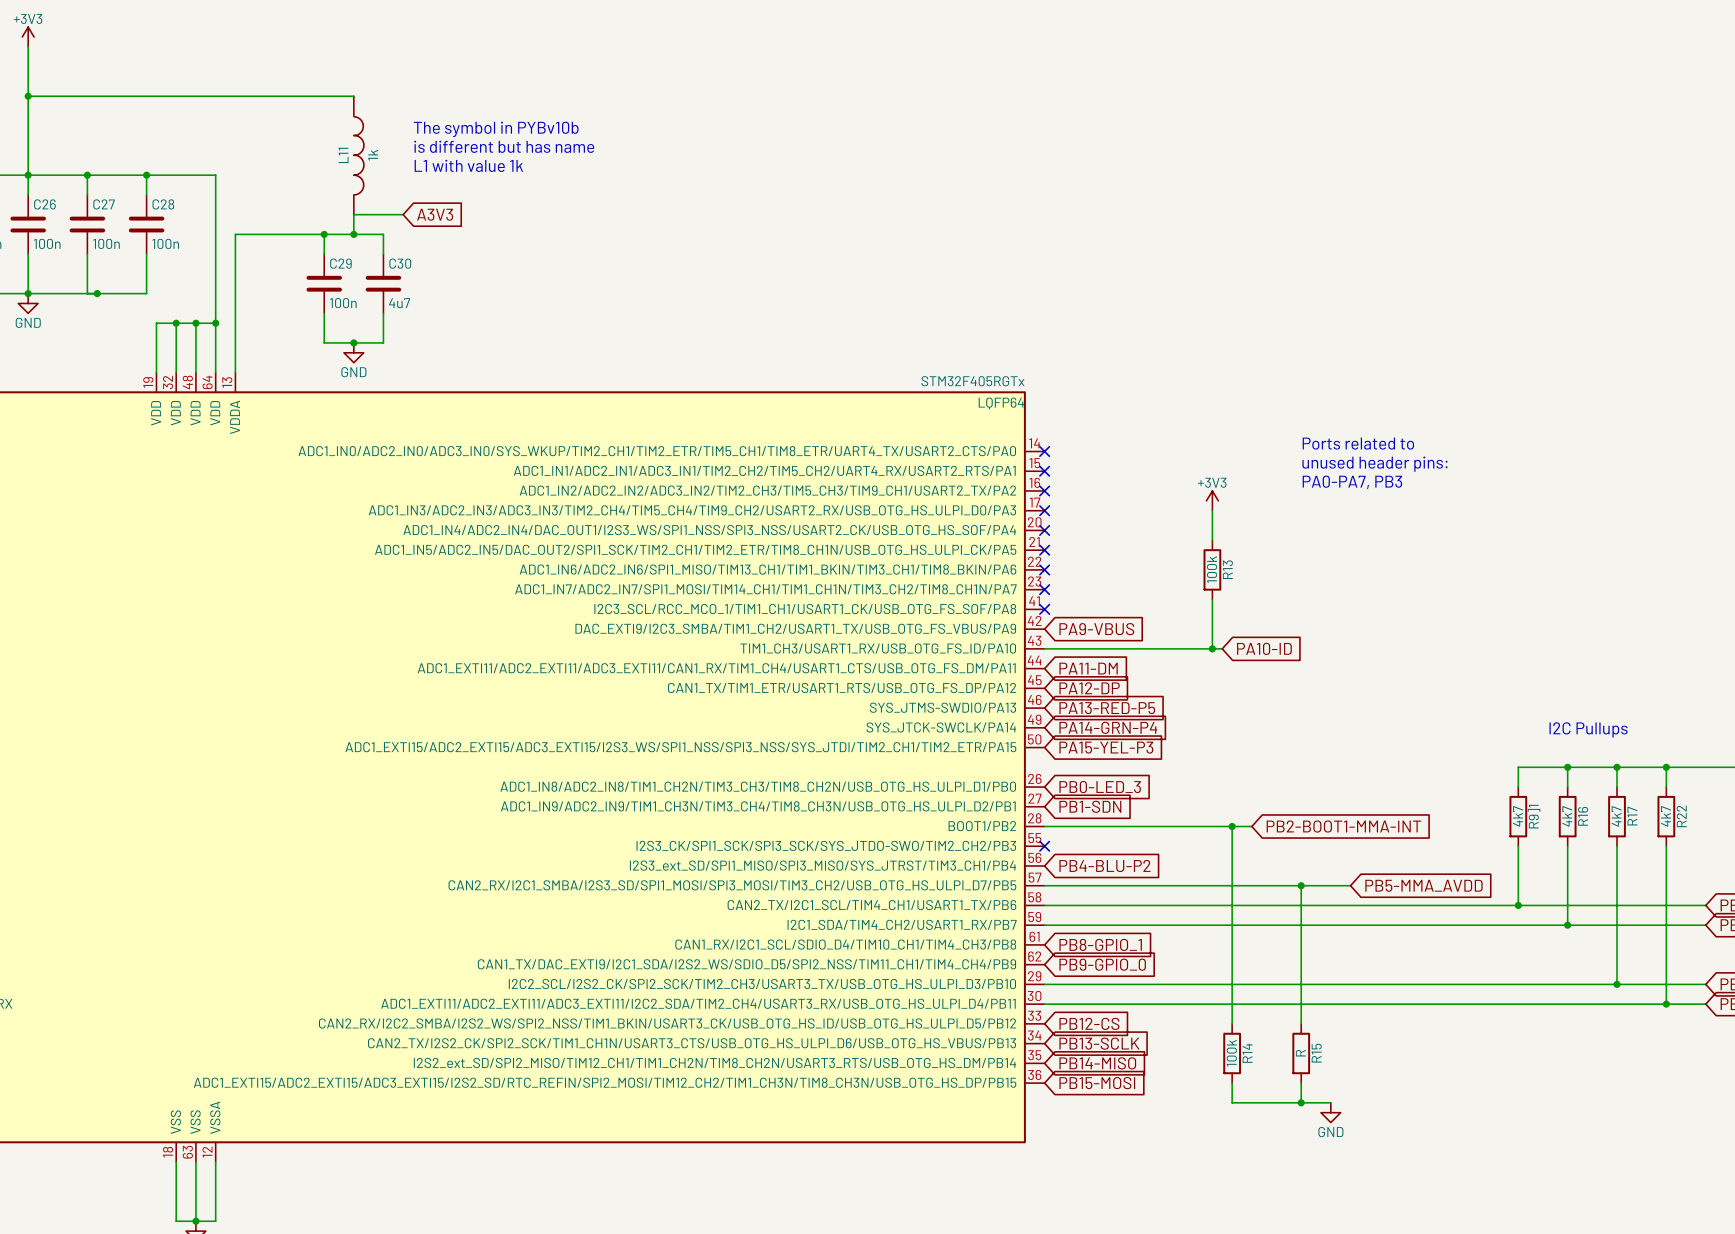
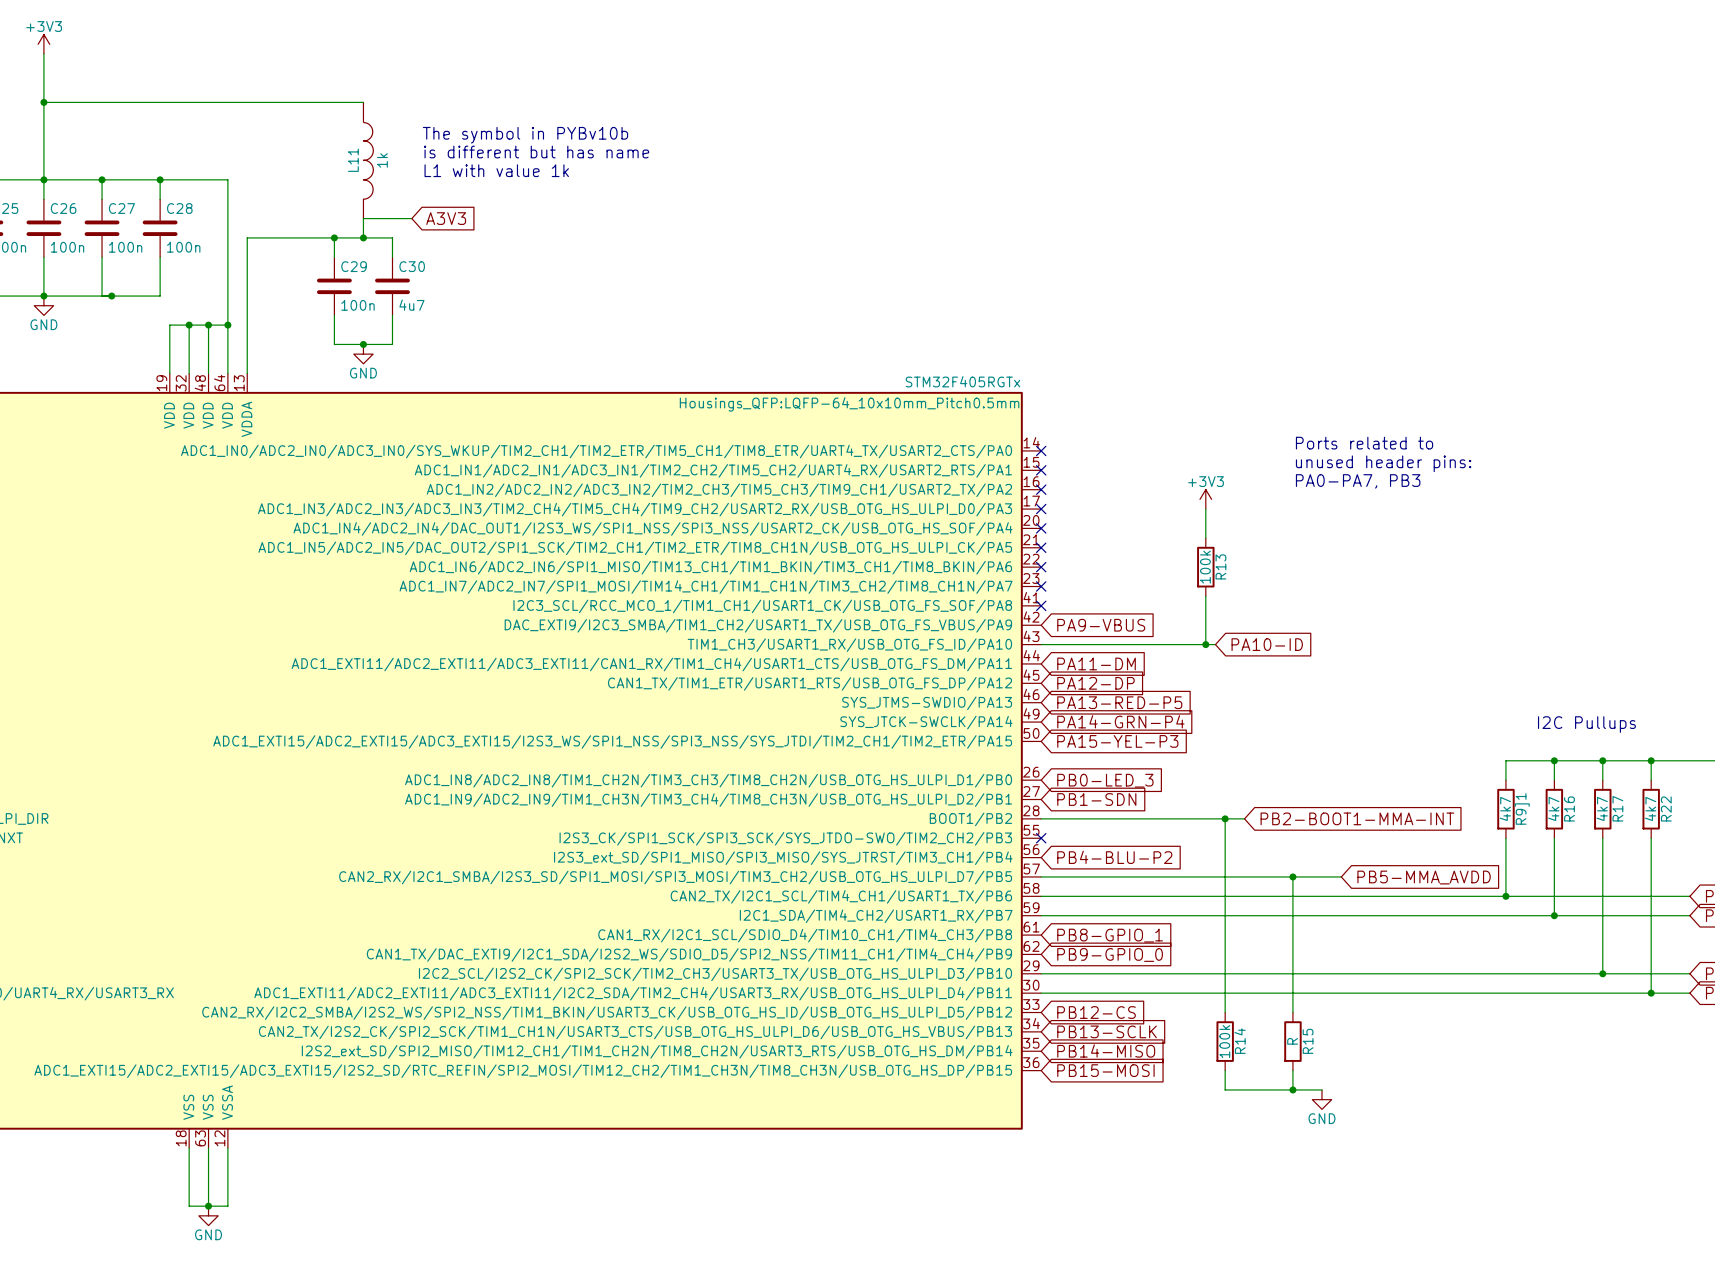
part text: LQFP64 (1001, 403) -> Housings_QFP:LQFP-64_10x10mm_Pitch0.5mm (849, 404)

